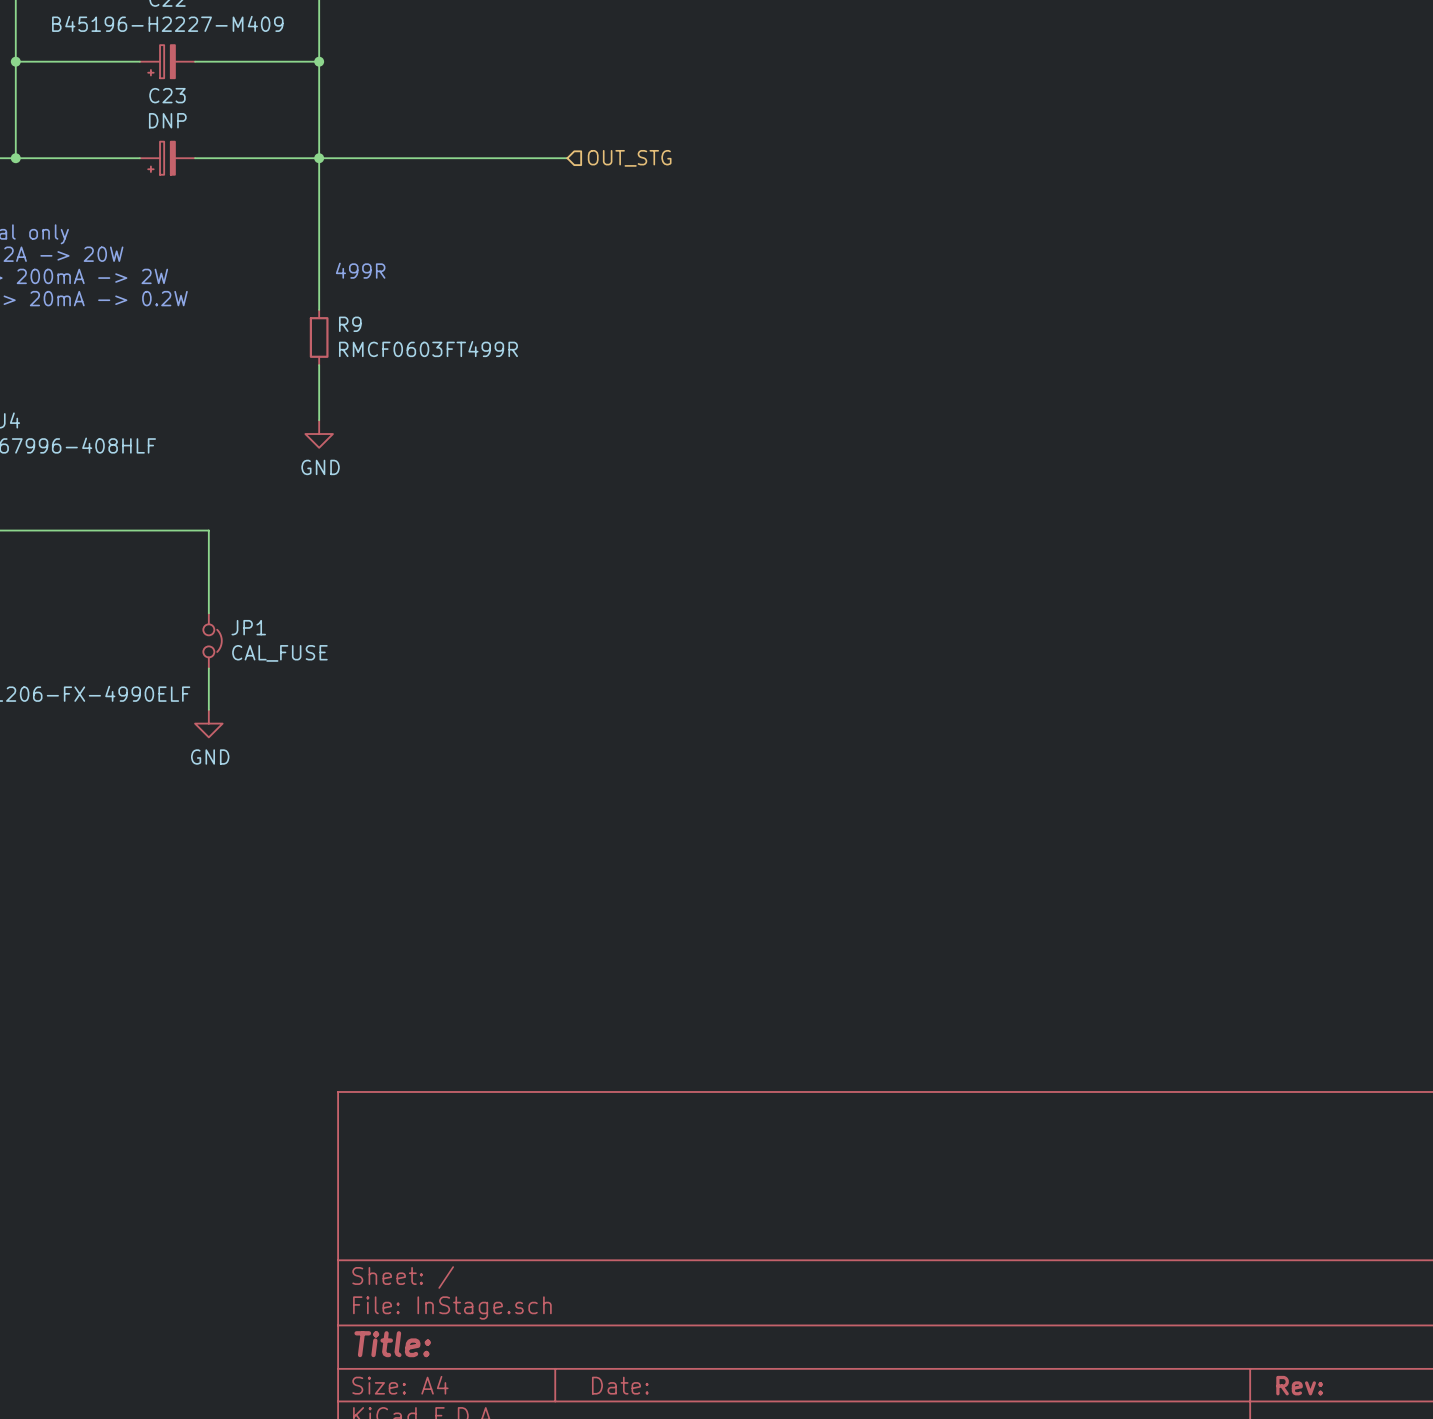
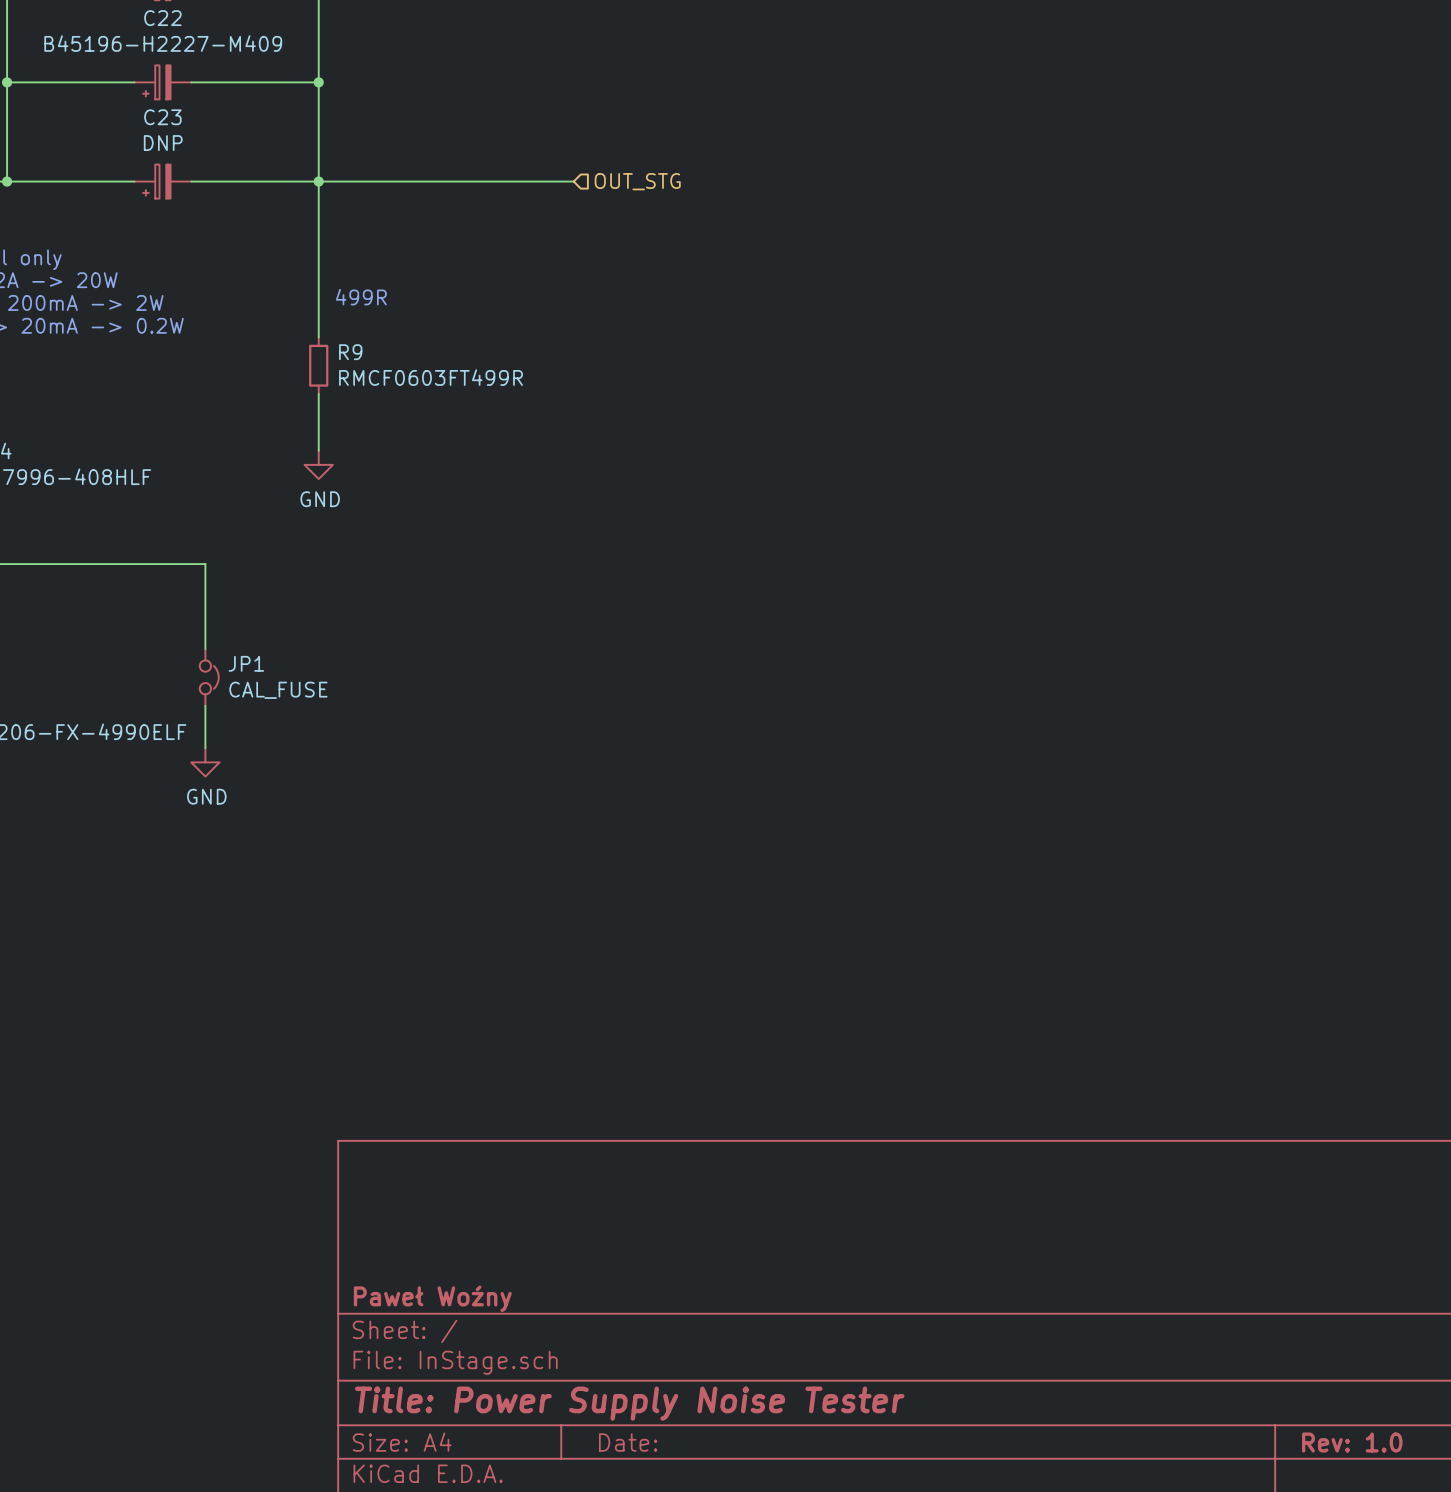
title block: none -> Paweł Woźny (432, 1298)
title block: Title: (392, 1344) -> Title: Power Supply Noise Tester (629, 1403)
title block: Rev: (1299, 1385) -> Rev: 1.0 (1352, 1442)

